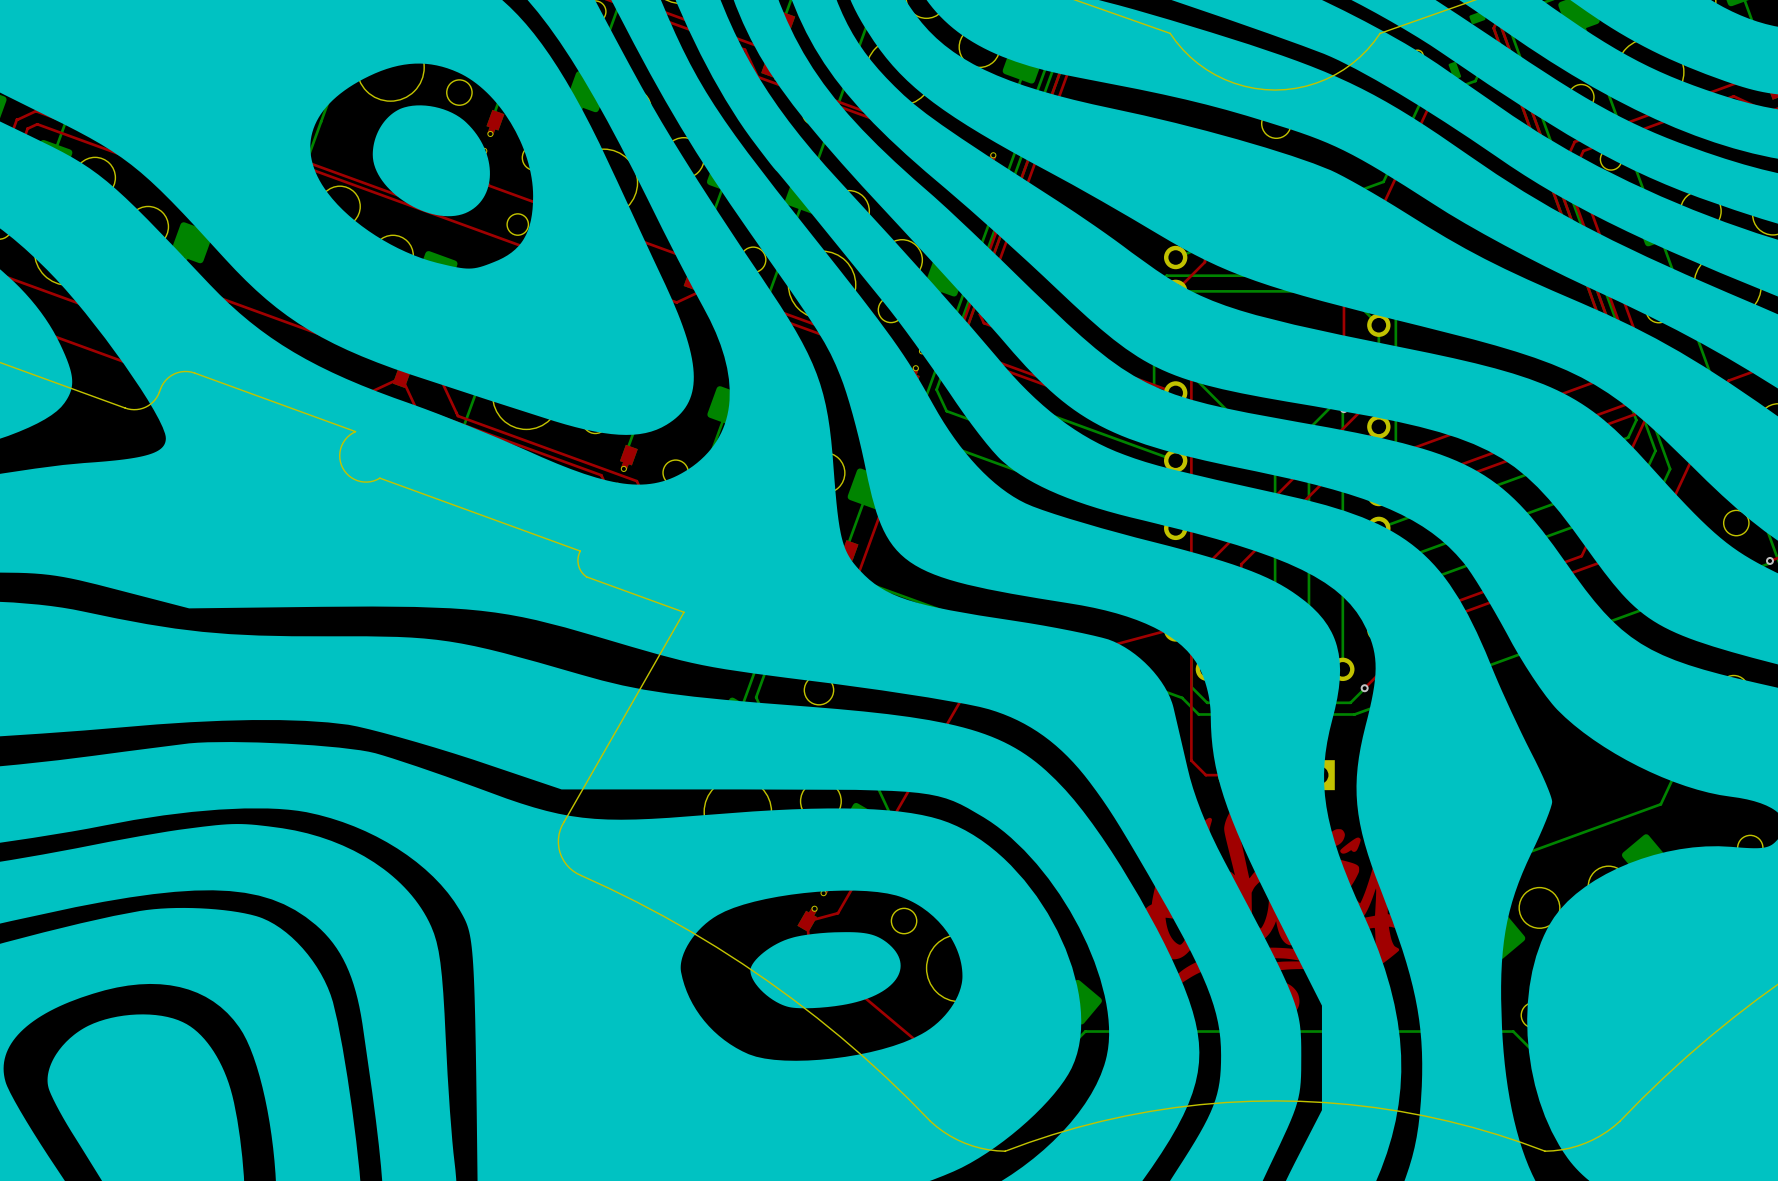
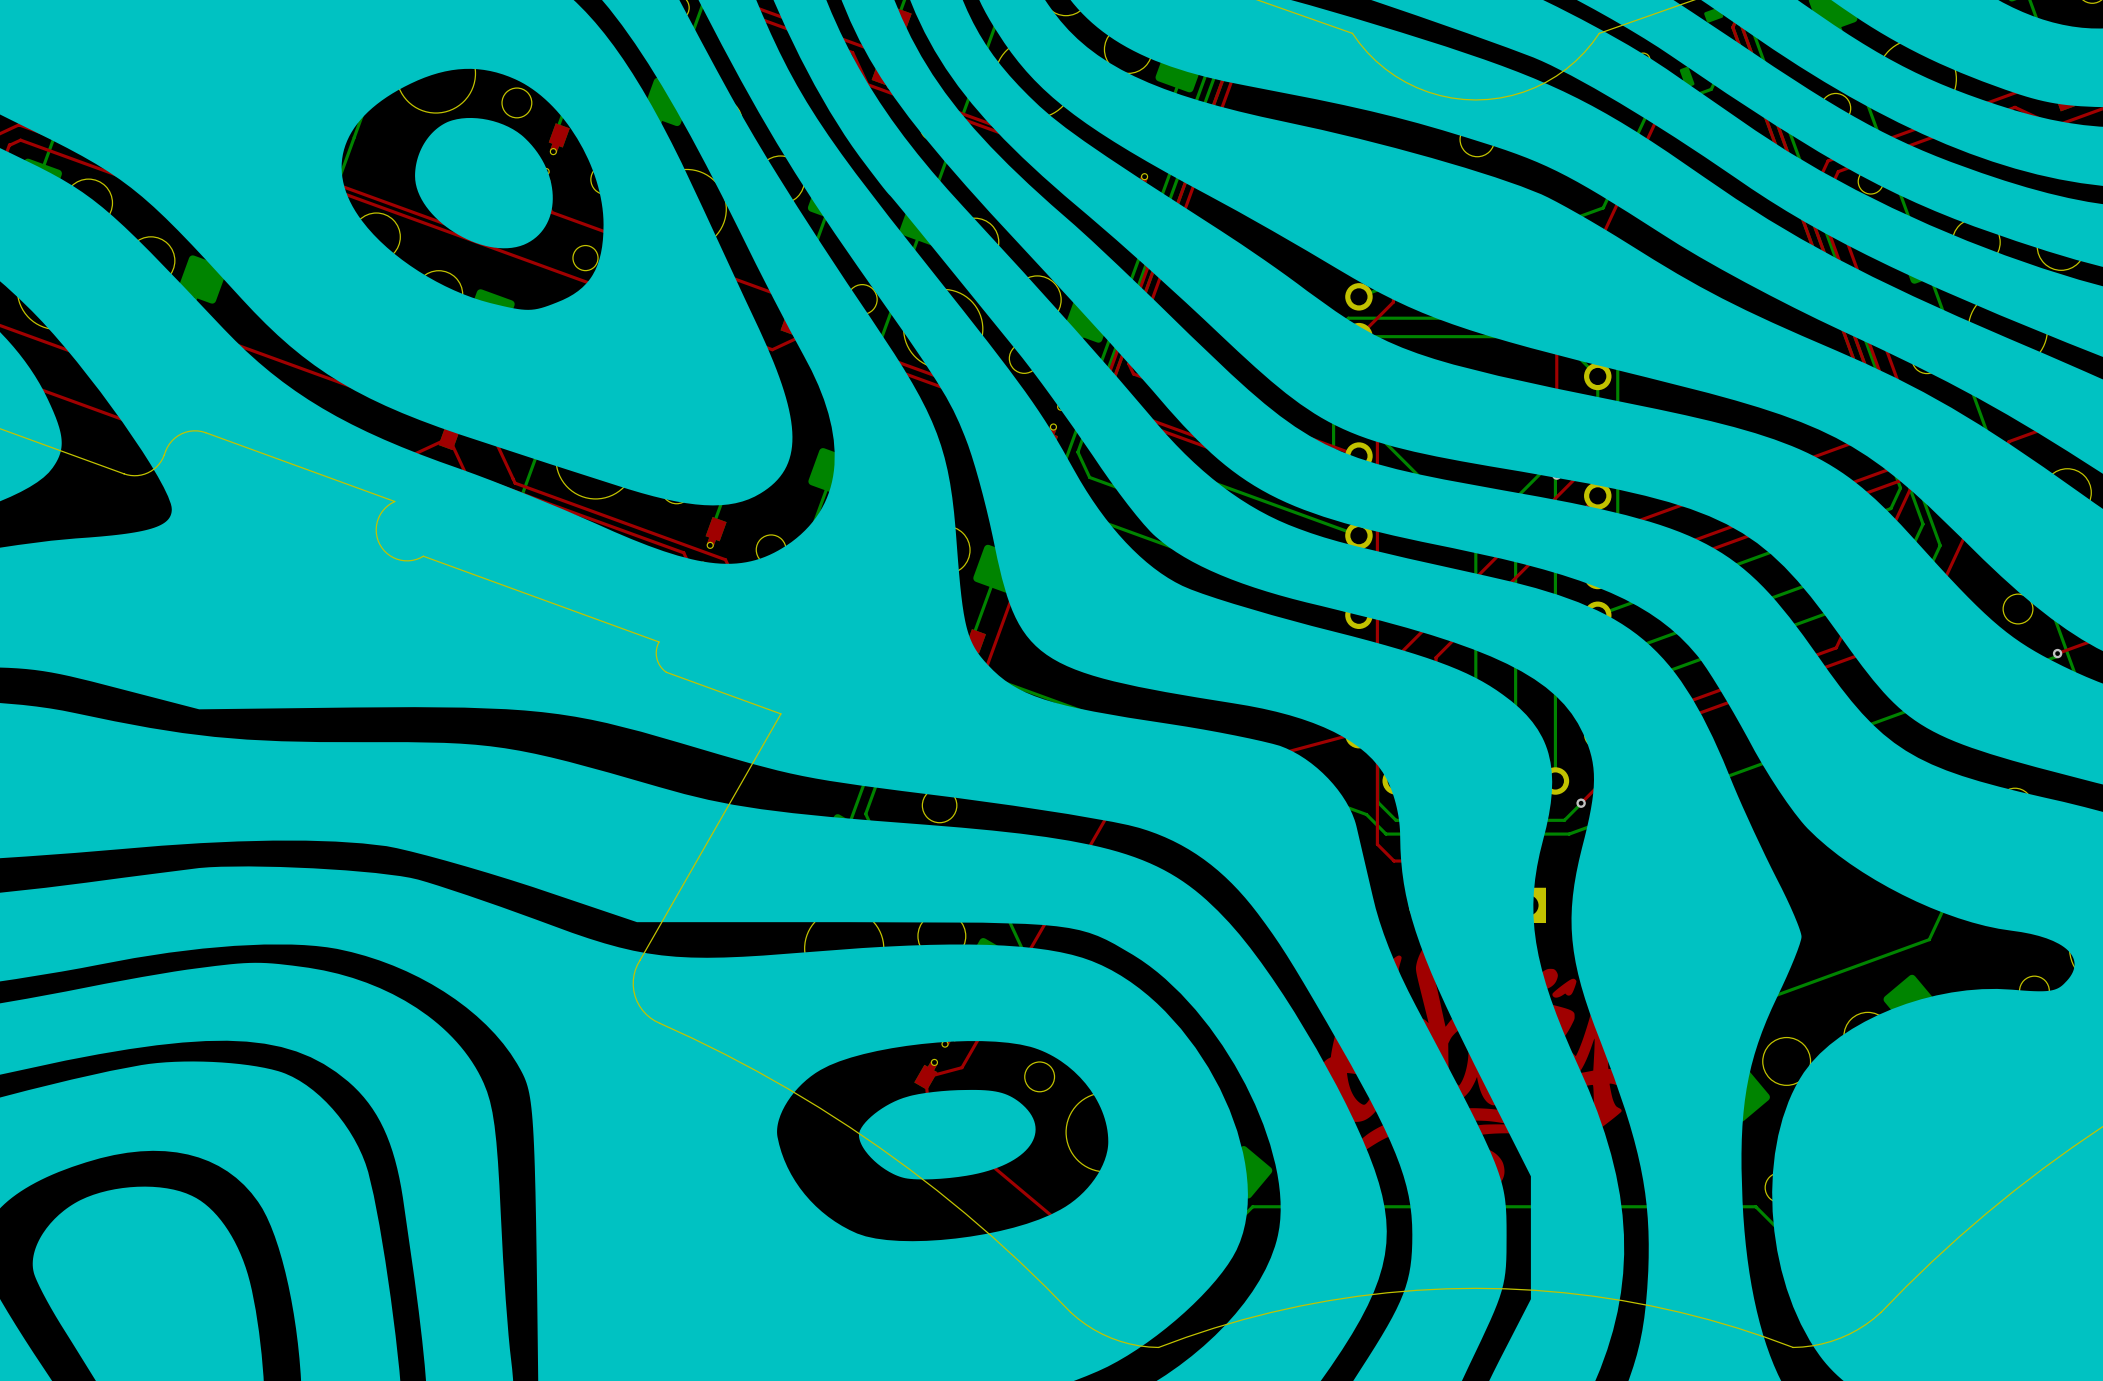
top track: (1191, 723) (1191, 760) (1205, 775) (1233, 775) -> (1377, 844) (1394, 861) (1426, 861)

